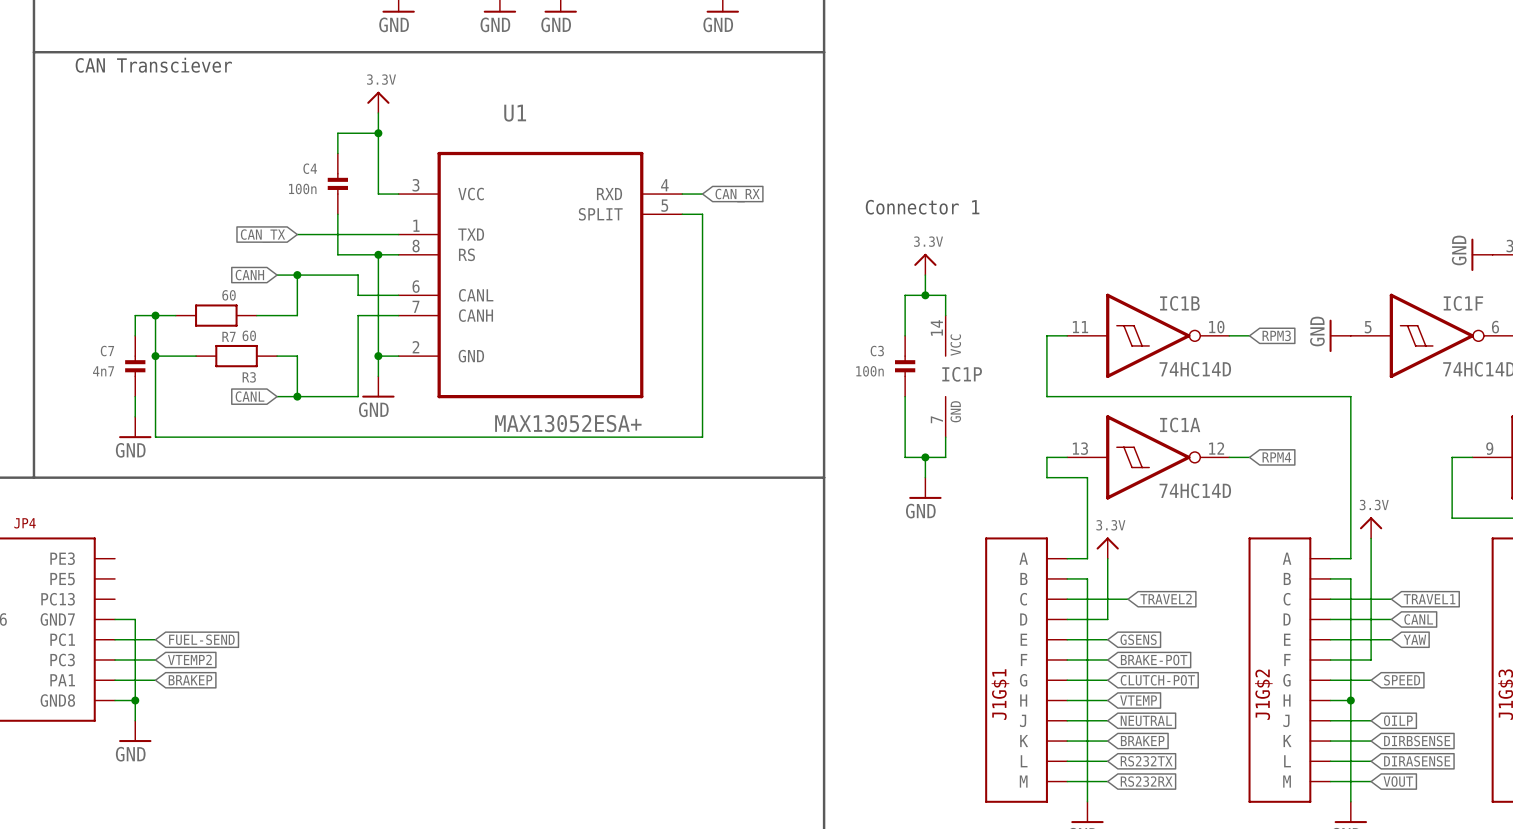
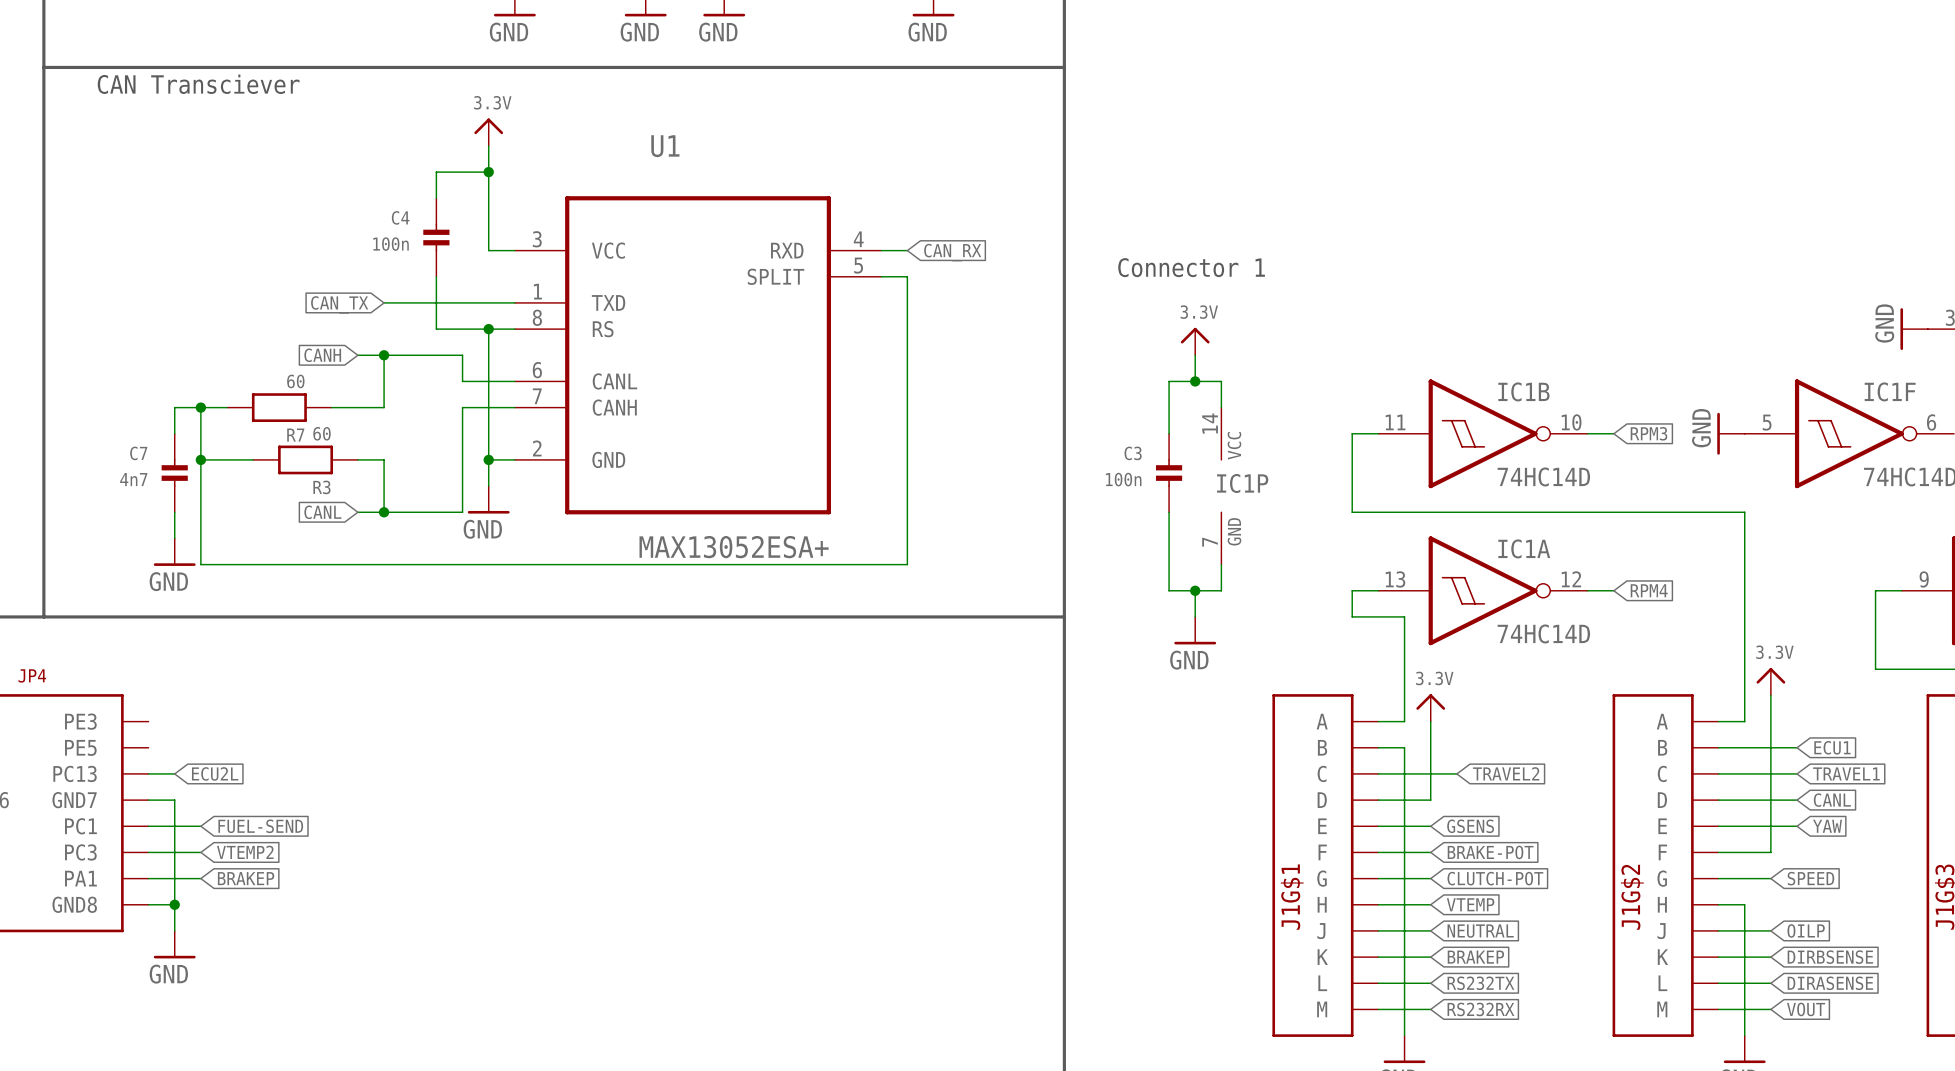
wire: (1350, 578) (1350, 700) -> (1744, 747) (1797, 747)
global label: none -> ECU1 (1832, 747)
wire: none -> (148, 773) (174, 773)
global label: none -> ECU2L (215, 773)
junction: (1350, 700) -> none

